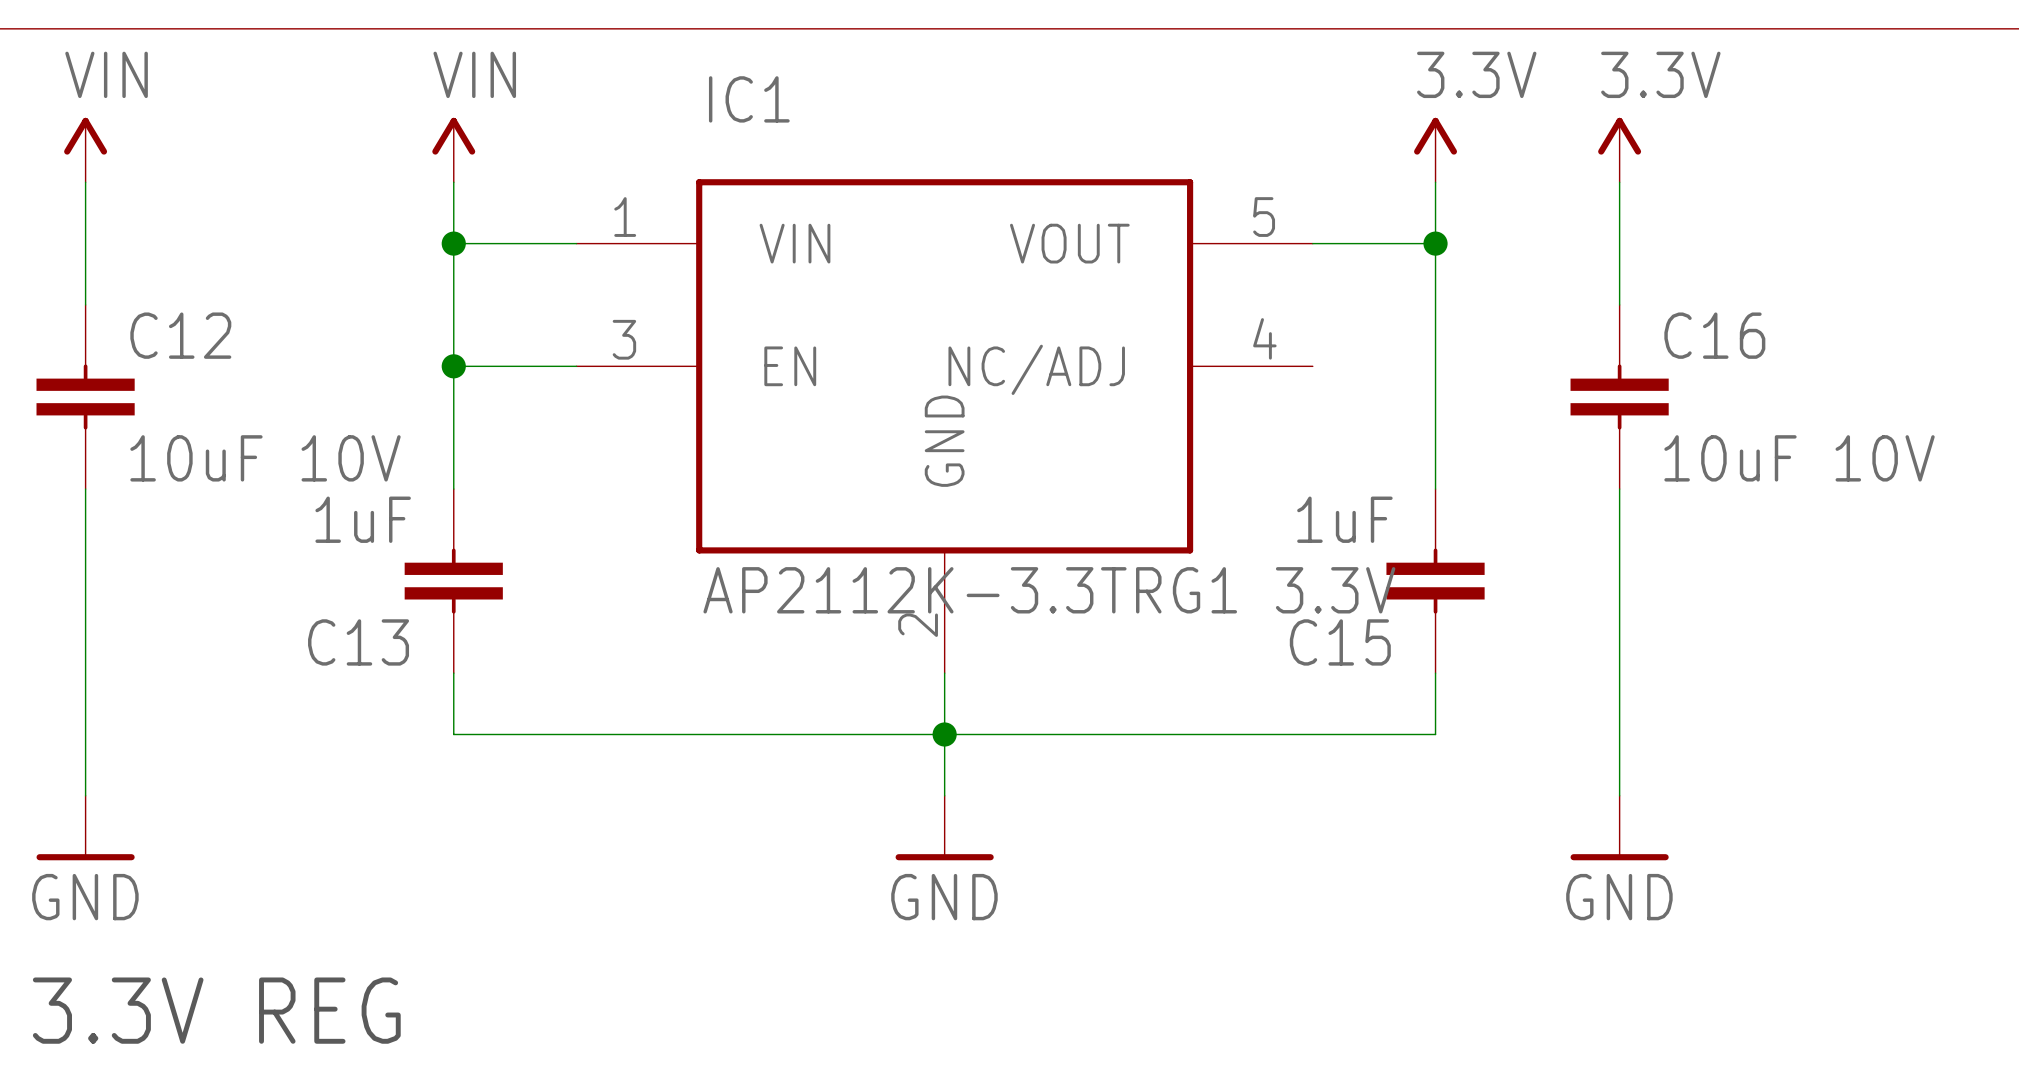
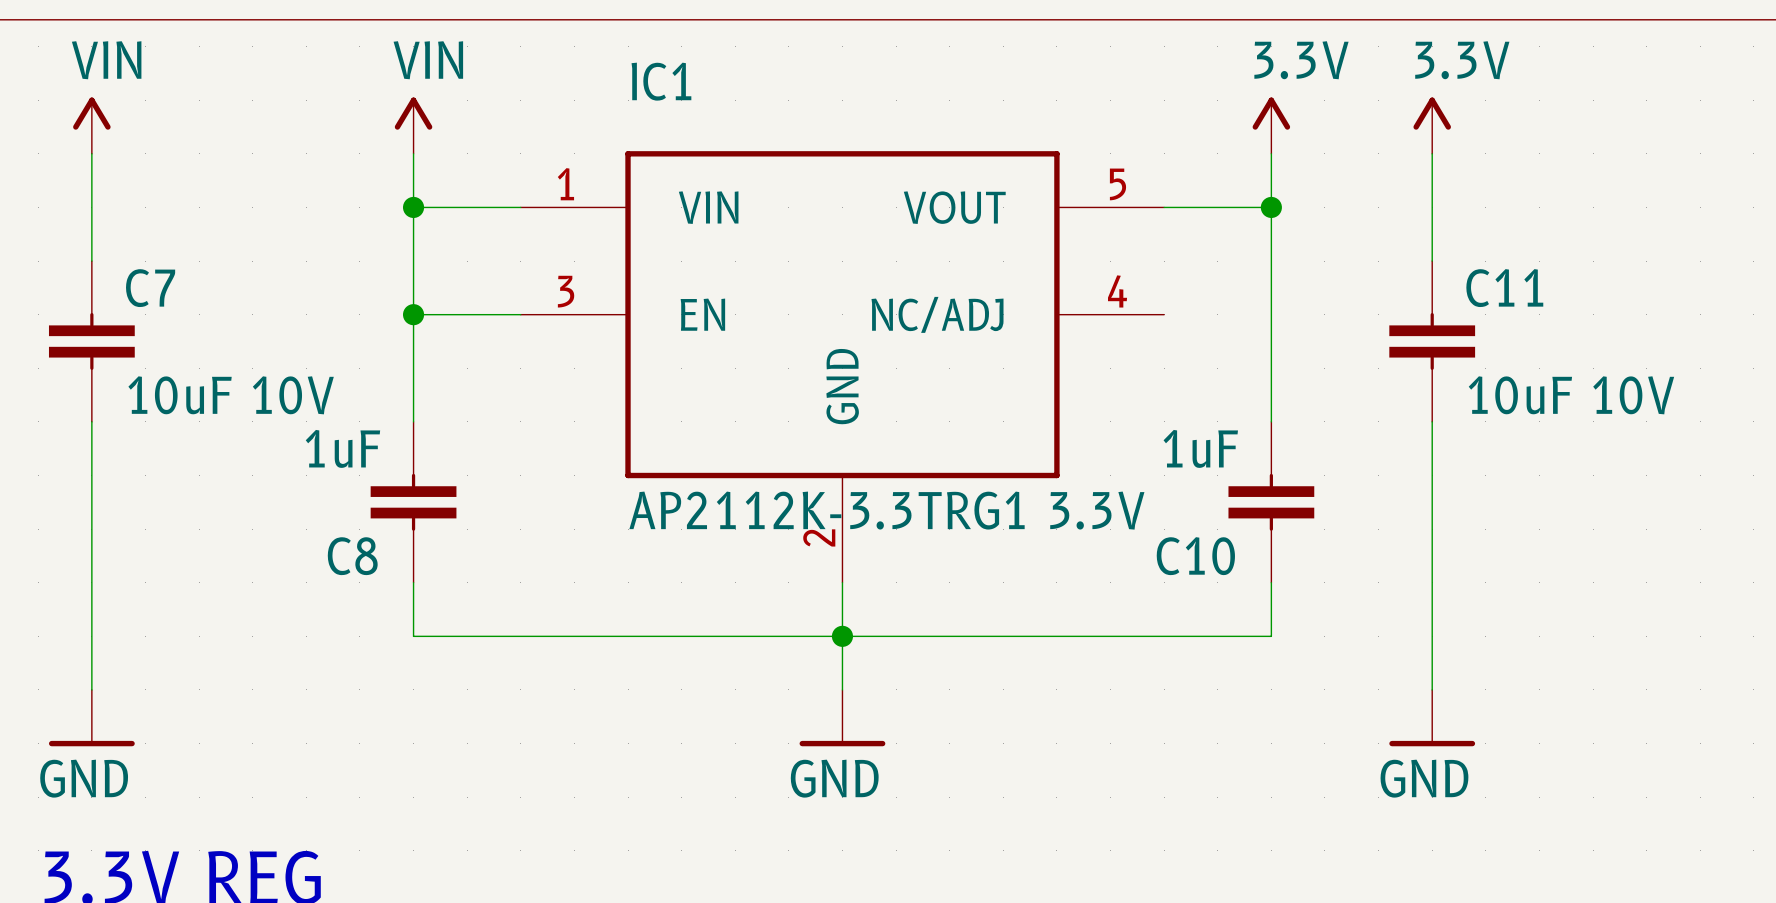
C12 name: C12 (180, 335) -> C7 (150, 288)
C16 name: C16 (1714, 335) -> C11 (1504, 288)
C13 name: C13 (358, 642) -> C8 (352, 556)
C15 name: C15 (1340, 642) -> C10 (1195, 556)

